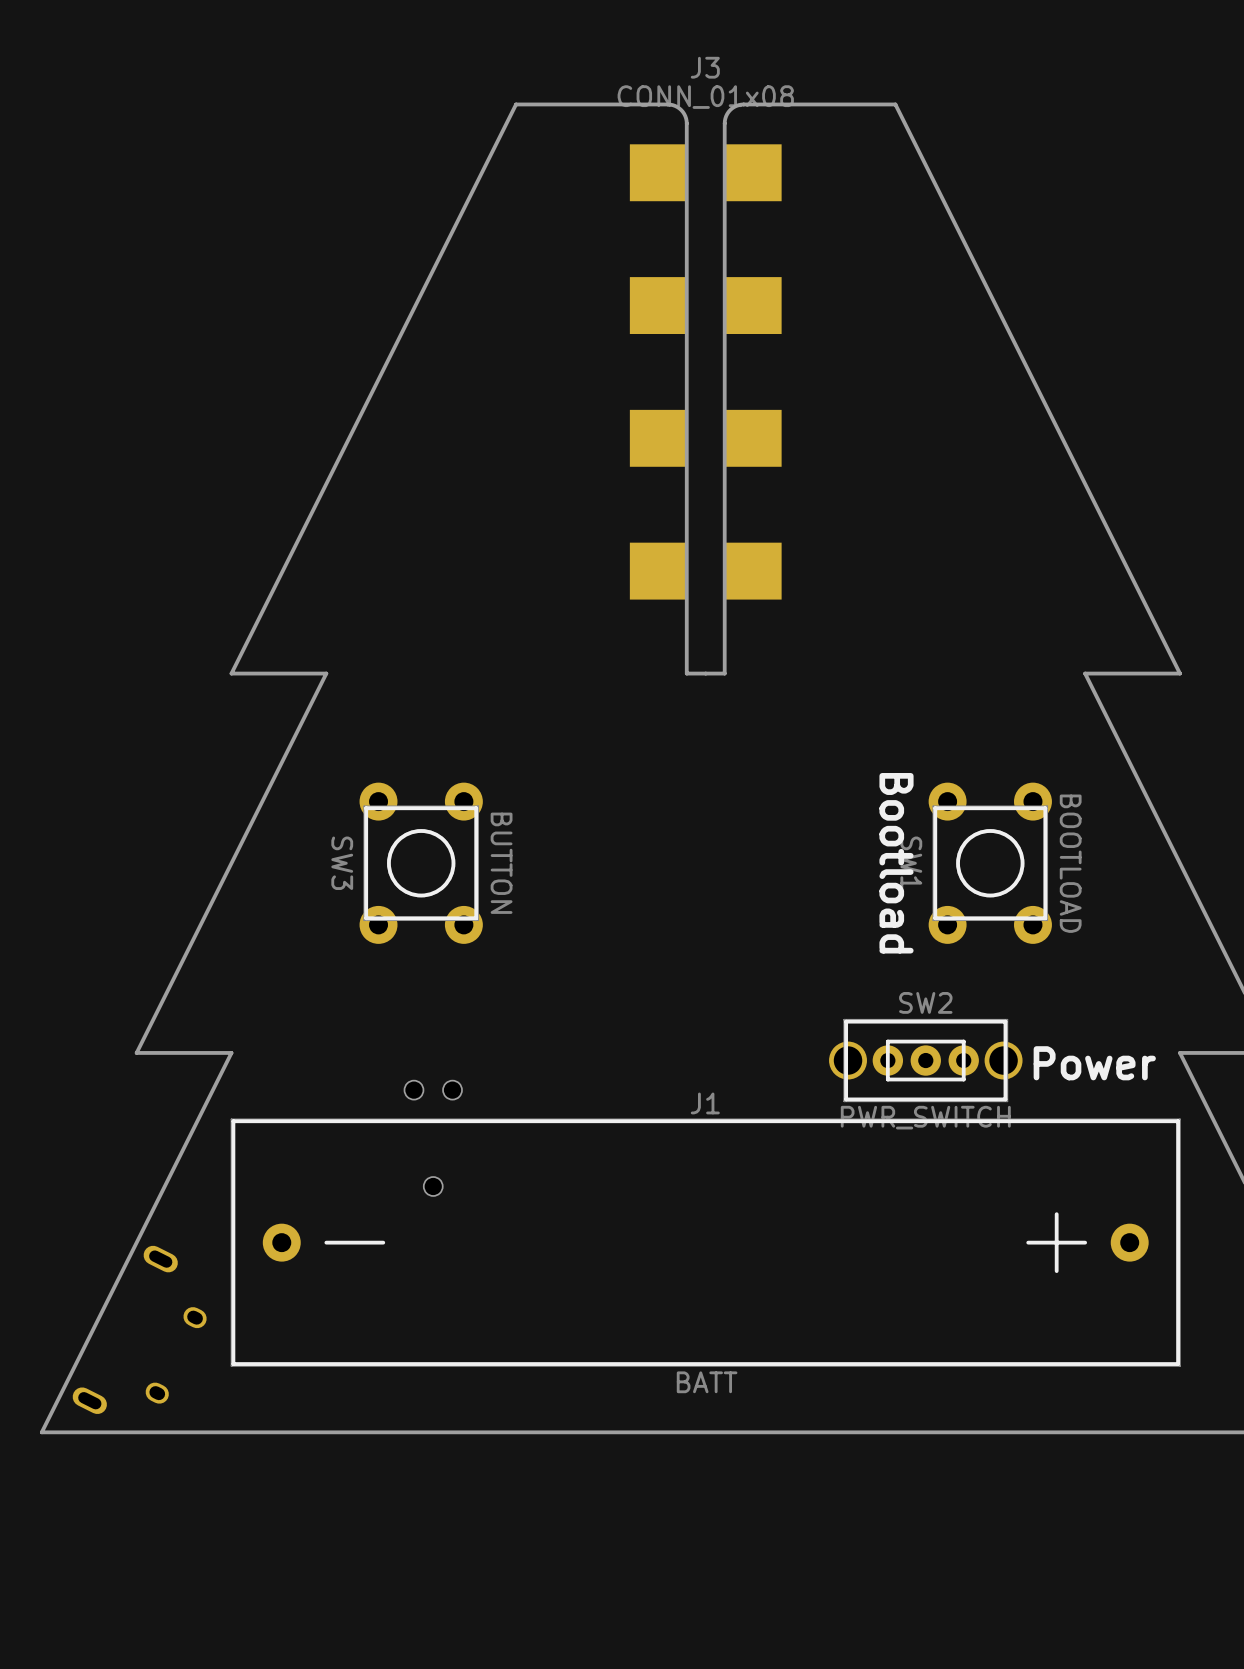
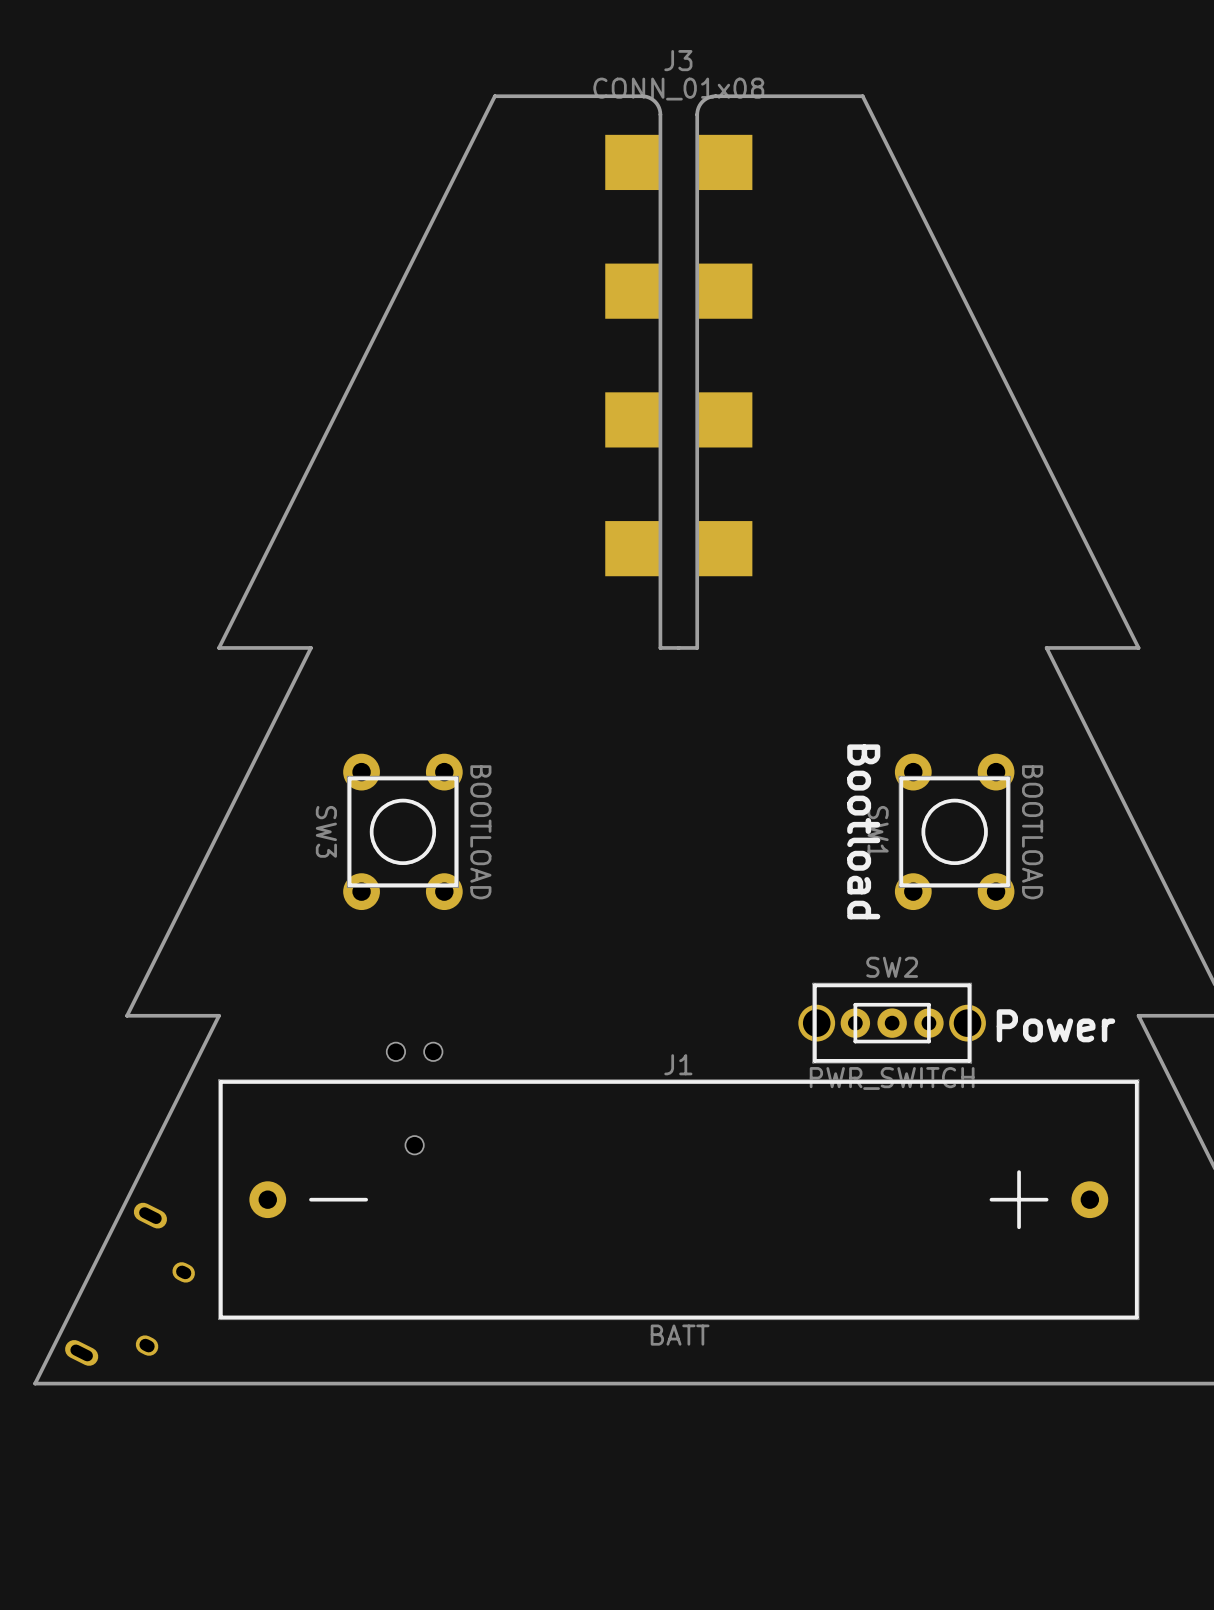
SW3 value: BUTTON (501, 863) -> BOOTLOAD (480, 832)

